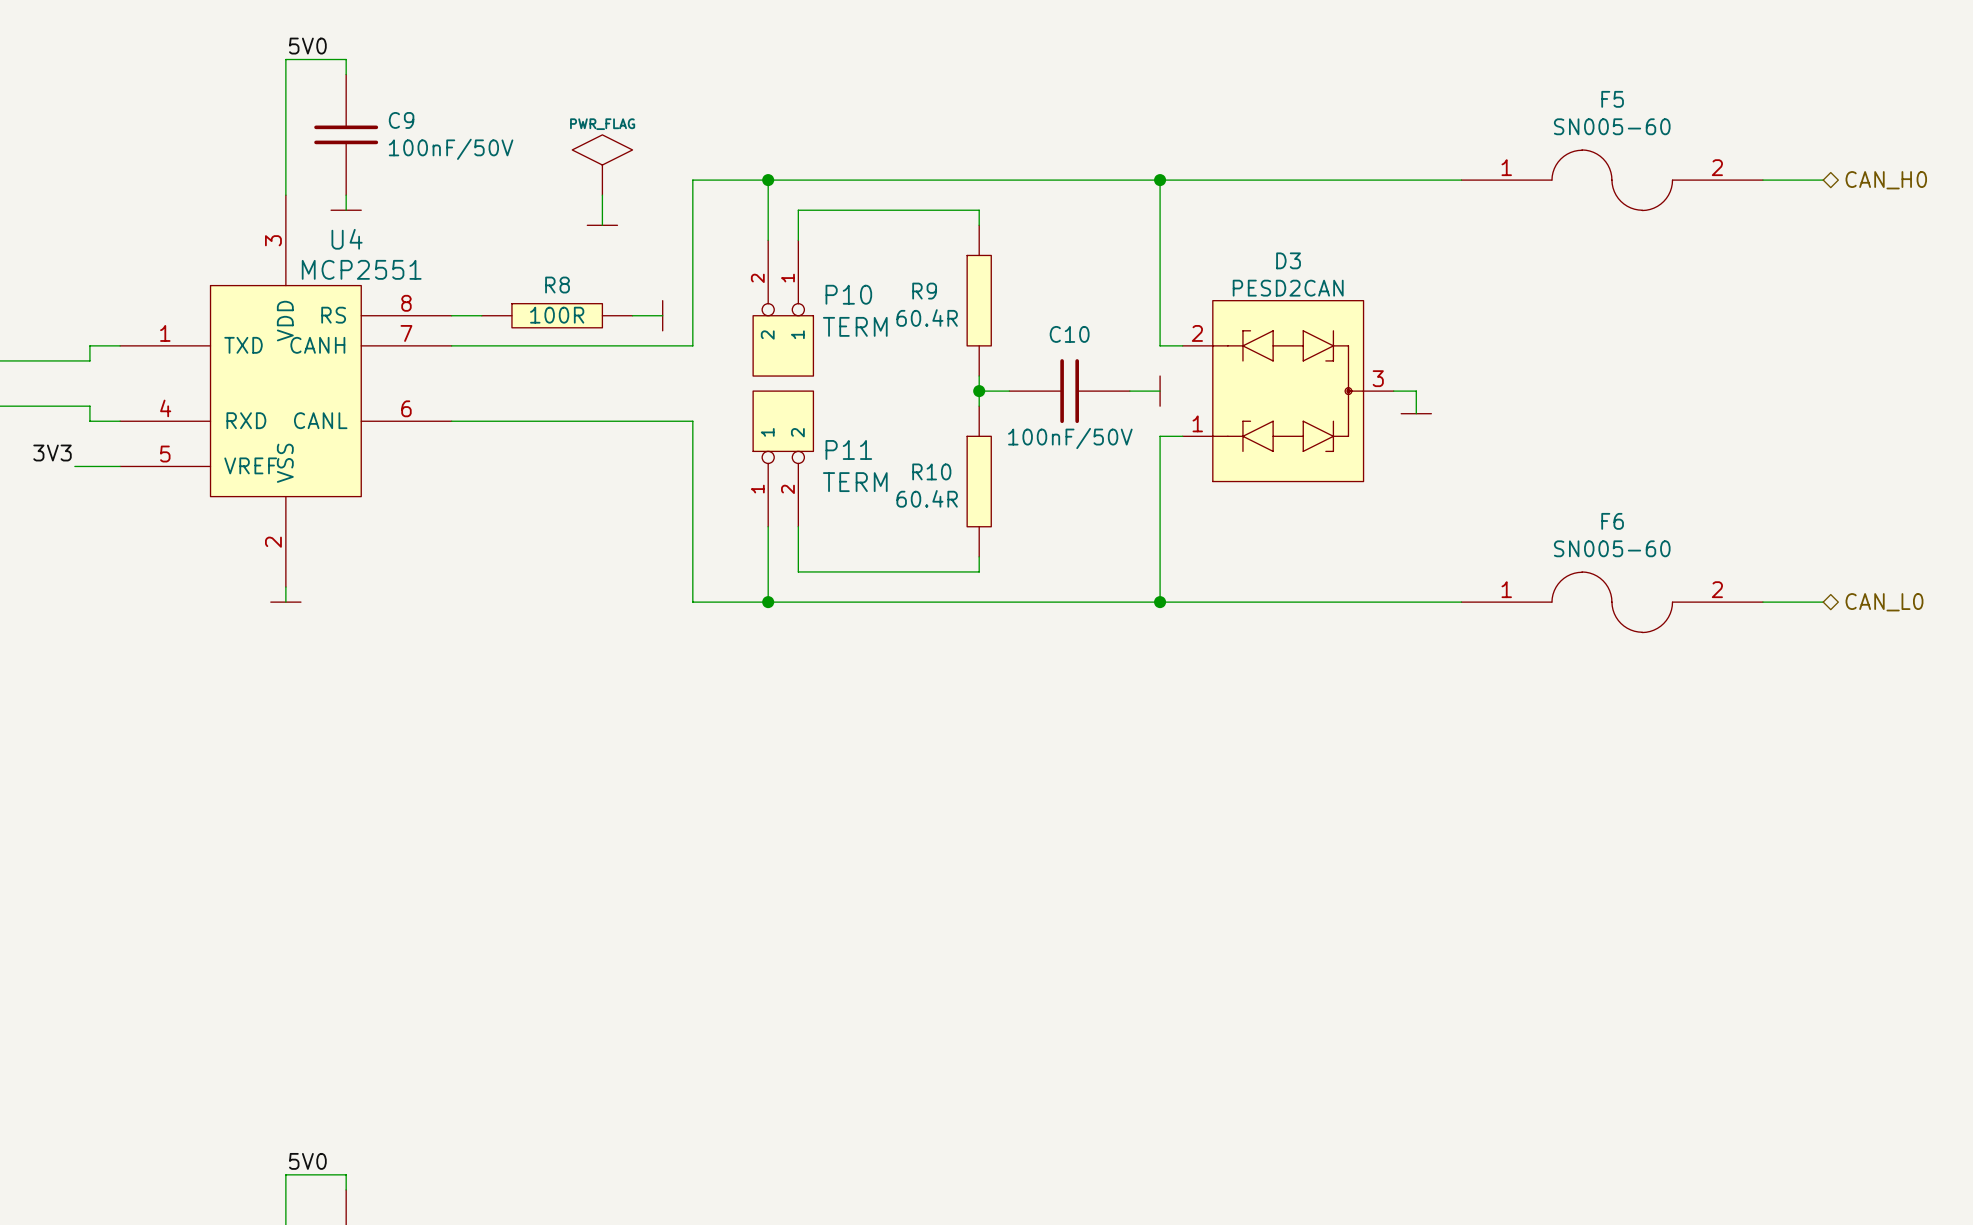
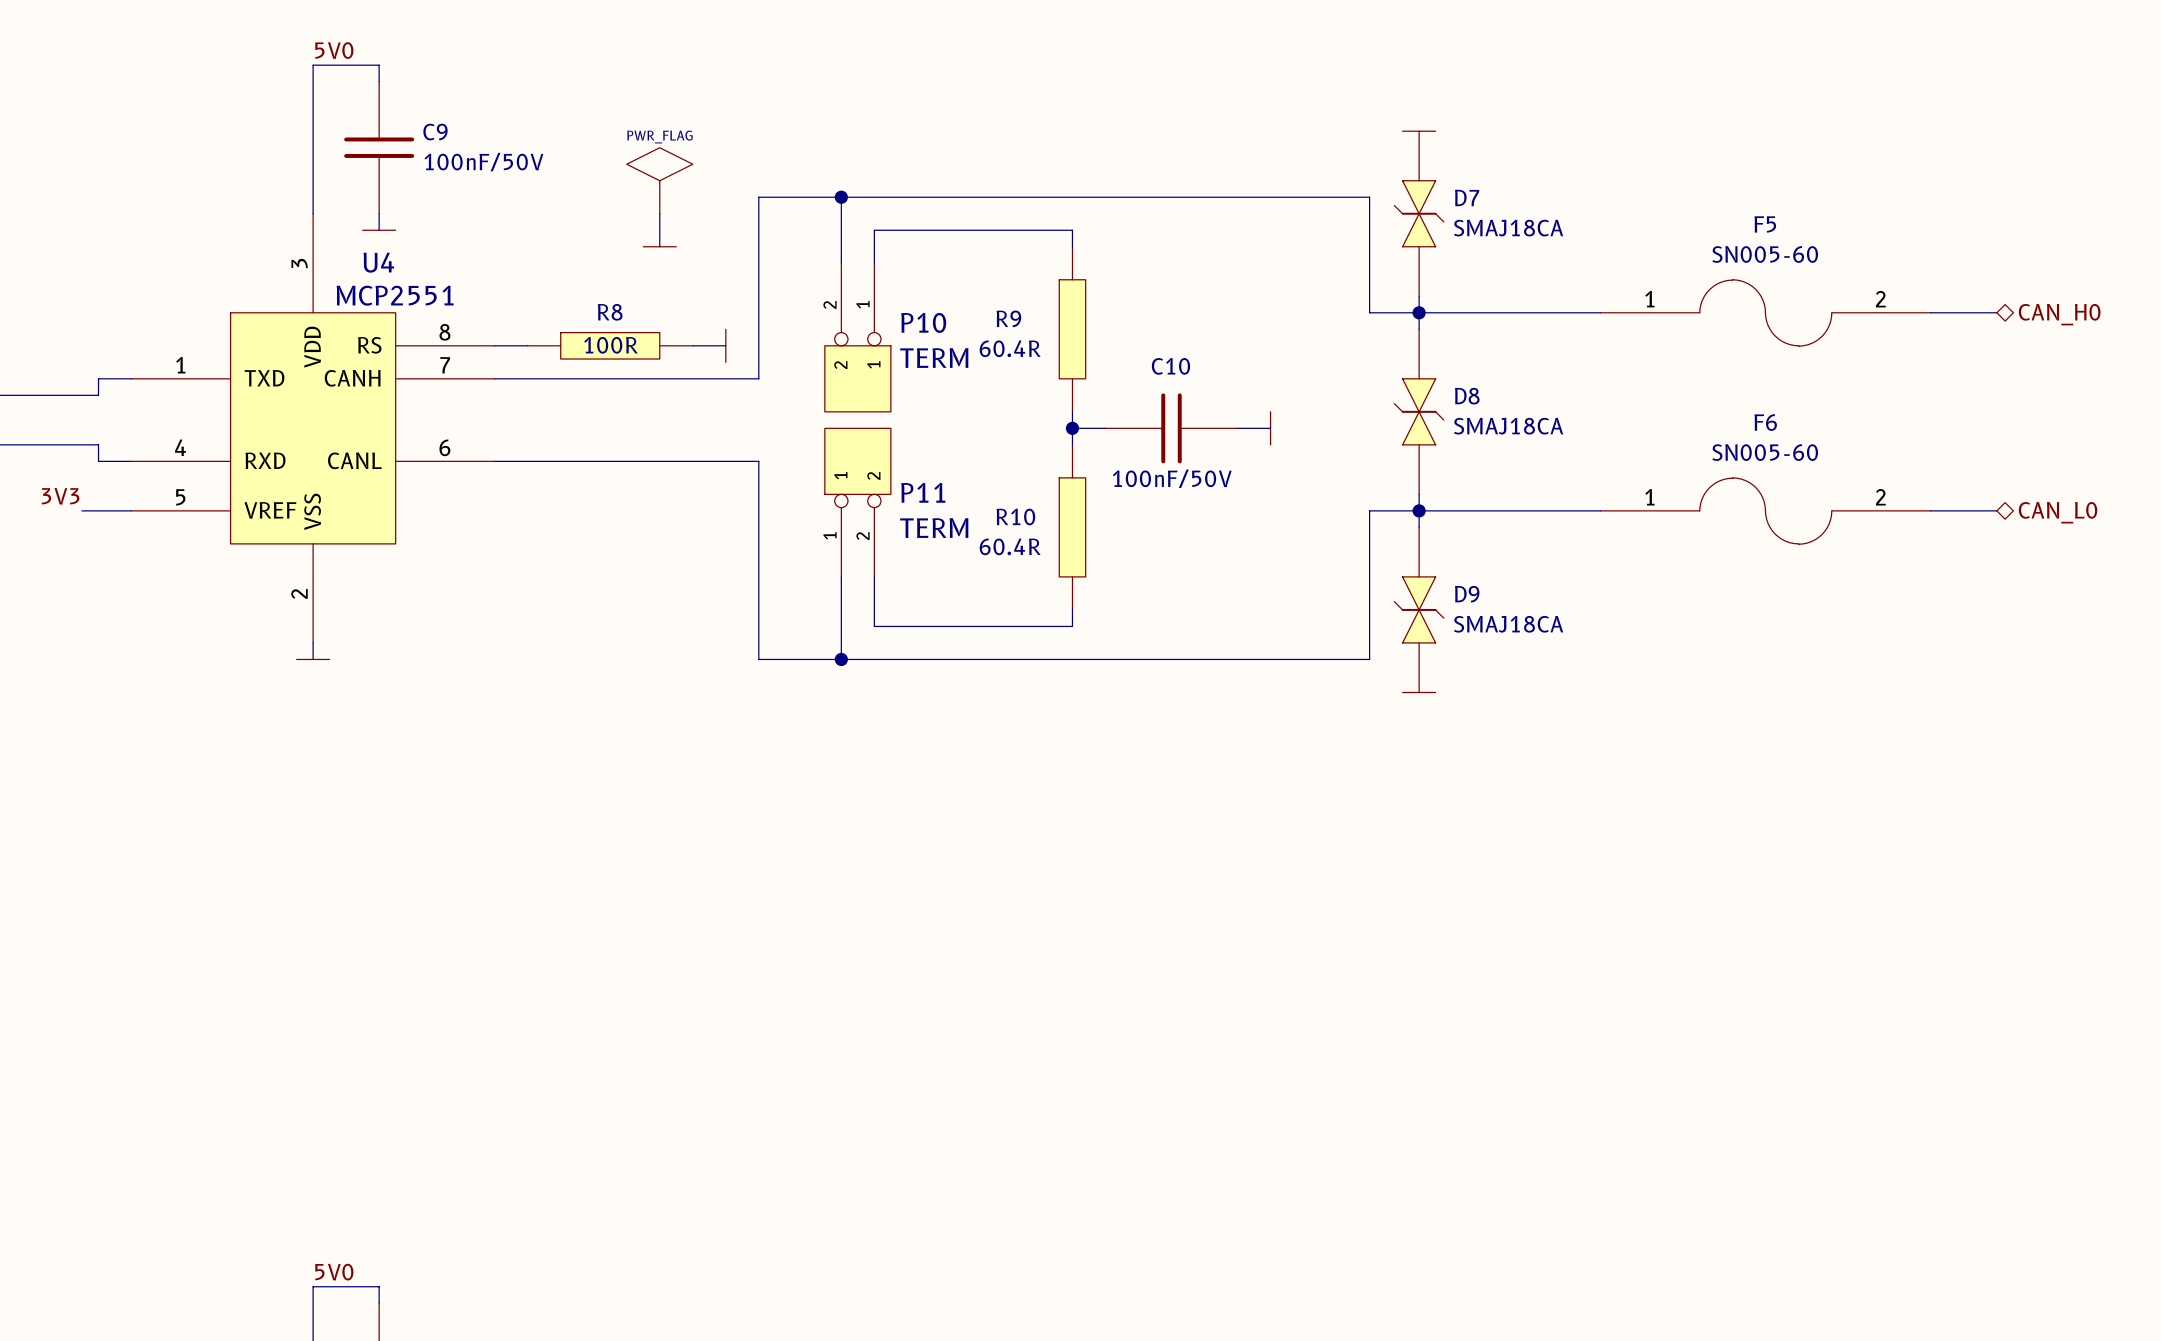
power symbol: none -> (1419, 131)
wire: (1160, 180) (1160, 345) (1182, 345) -> none
junction: (1160, 180) -> none
wire: (1250, 180) (1461, 180) -> (1369, 197) (1369, 312) (1600, 312)
F5 position: (1612, 180) -> (1765, 312)
wire: (1762, 180) (1823, 180) -> (1930, 312) (1996, 312)
hierarchical label position: CAN_H0 (1886, 180) -> CAN_H0 (2059, 314)
D7: none -> SMAJ18CA (1419, 213)
wire: none -> (1419, 296) (1419, 329)
junction: none -> (1419, 312)
D8: none -> SMAJ18CA (1419, 411)
D3: PESD2CAN (1288, 391) -> none
wire: (1393, 391) (1416, 391) (1416, 413) -> none
power symbol: (1416, 413) -> none
wire: (1182, 436) (1160, 436) (1160, 602) -> none
junction: none -> (1419, 510)
D9: none -> SMAJ18CA (1419, 609)
junction: (1160, 602) -> none
wire: (1250, 602) (1461, 602) -> (1369, 659) (1369, 510) (1600, 510)
F6 position: (1612, 602) -> (1765, 511)
wire: (1762, 602) (1823, 602) -> (1930, 510) (1996, 510)
hierarchical label position: CAN_L0 (1884, 602) -> CAN_L0 (2058, 512)
power symbol: none -> (1419, 692)

